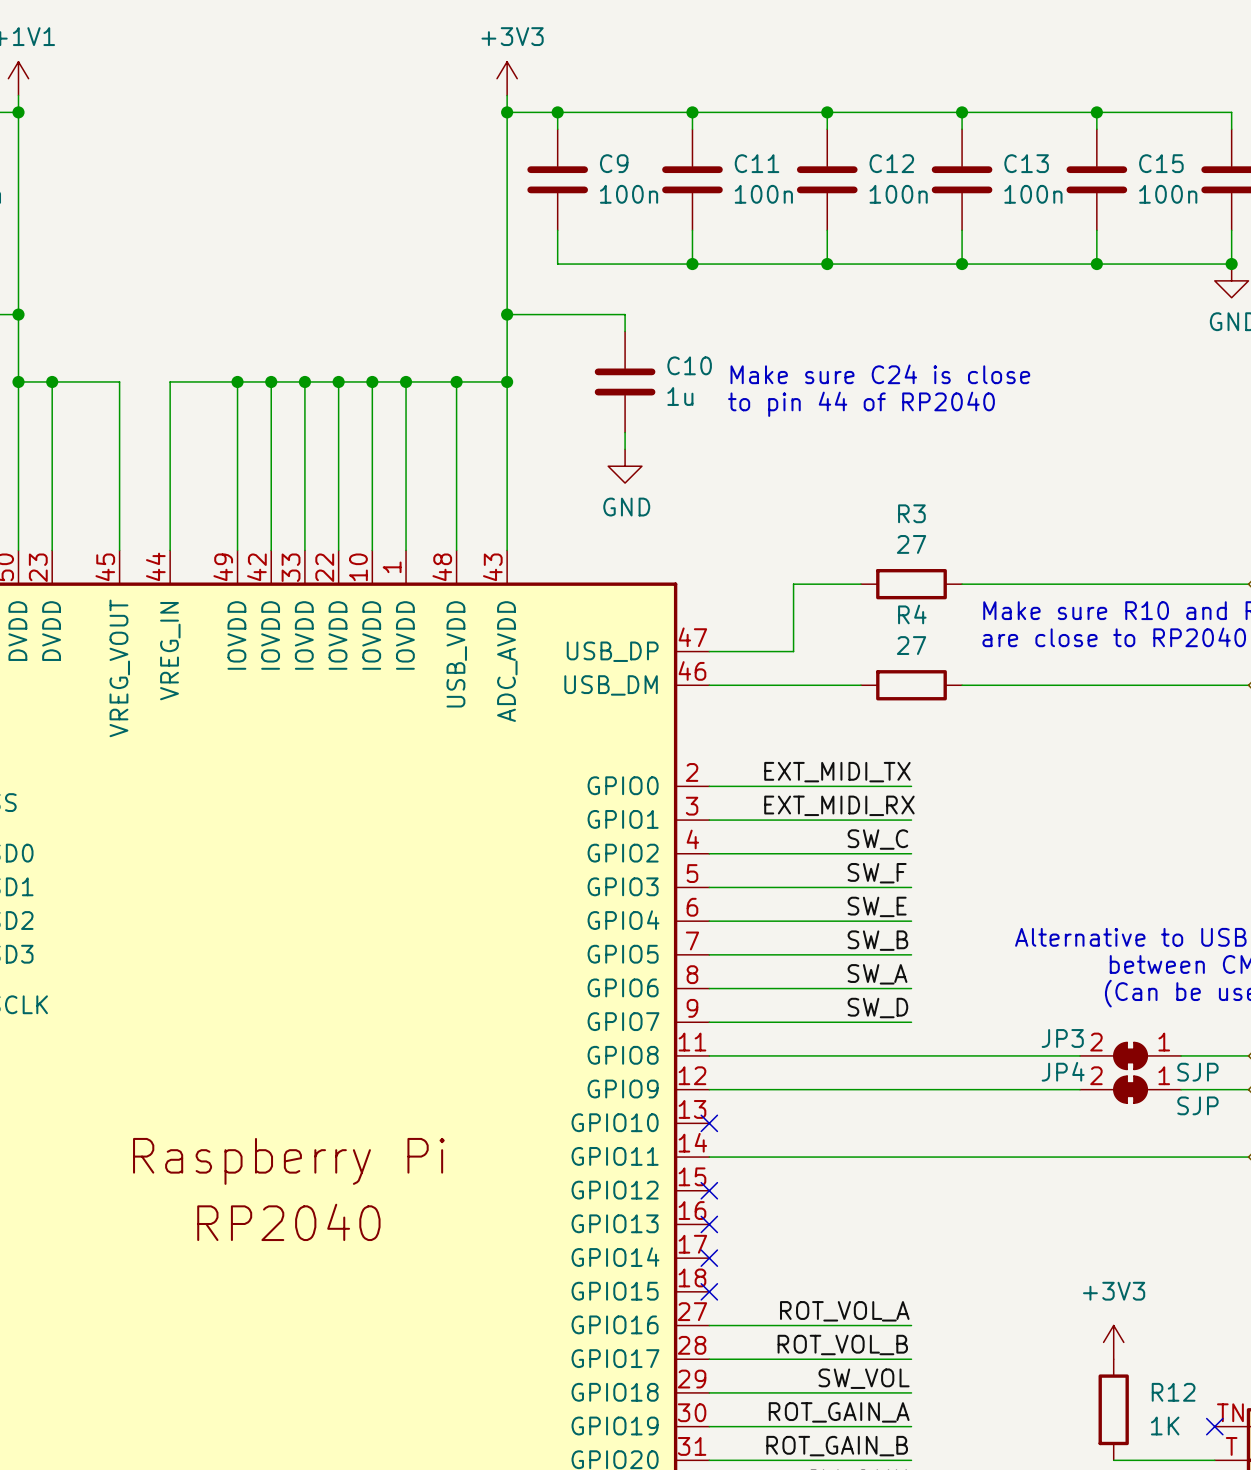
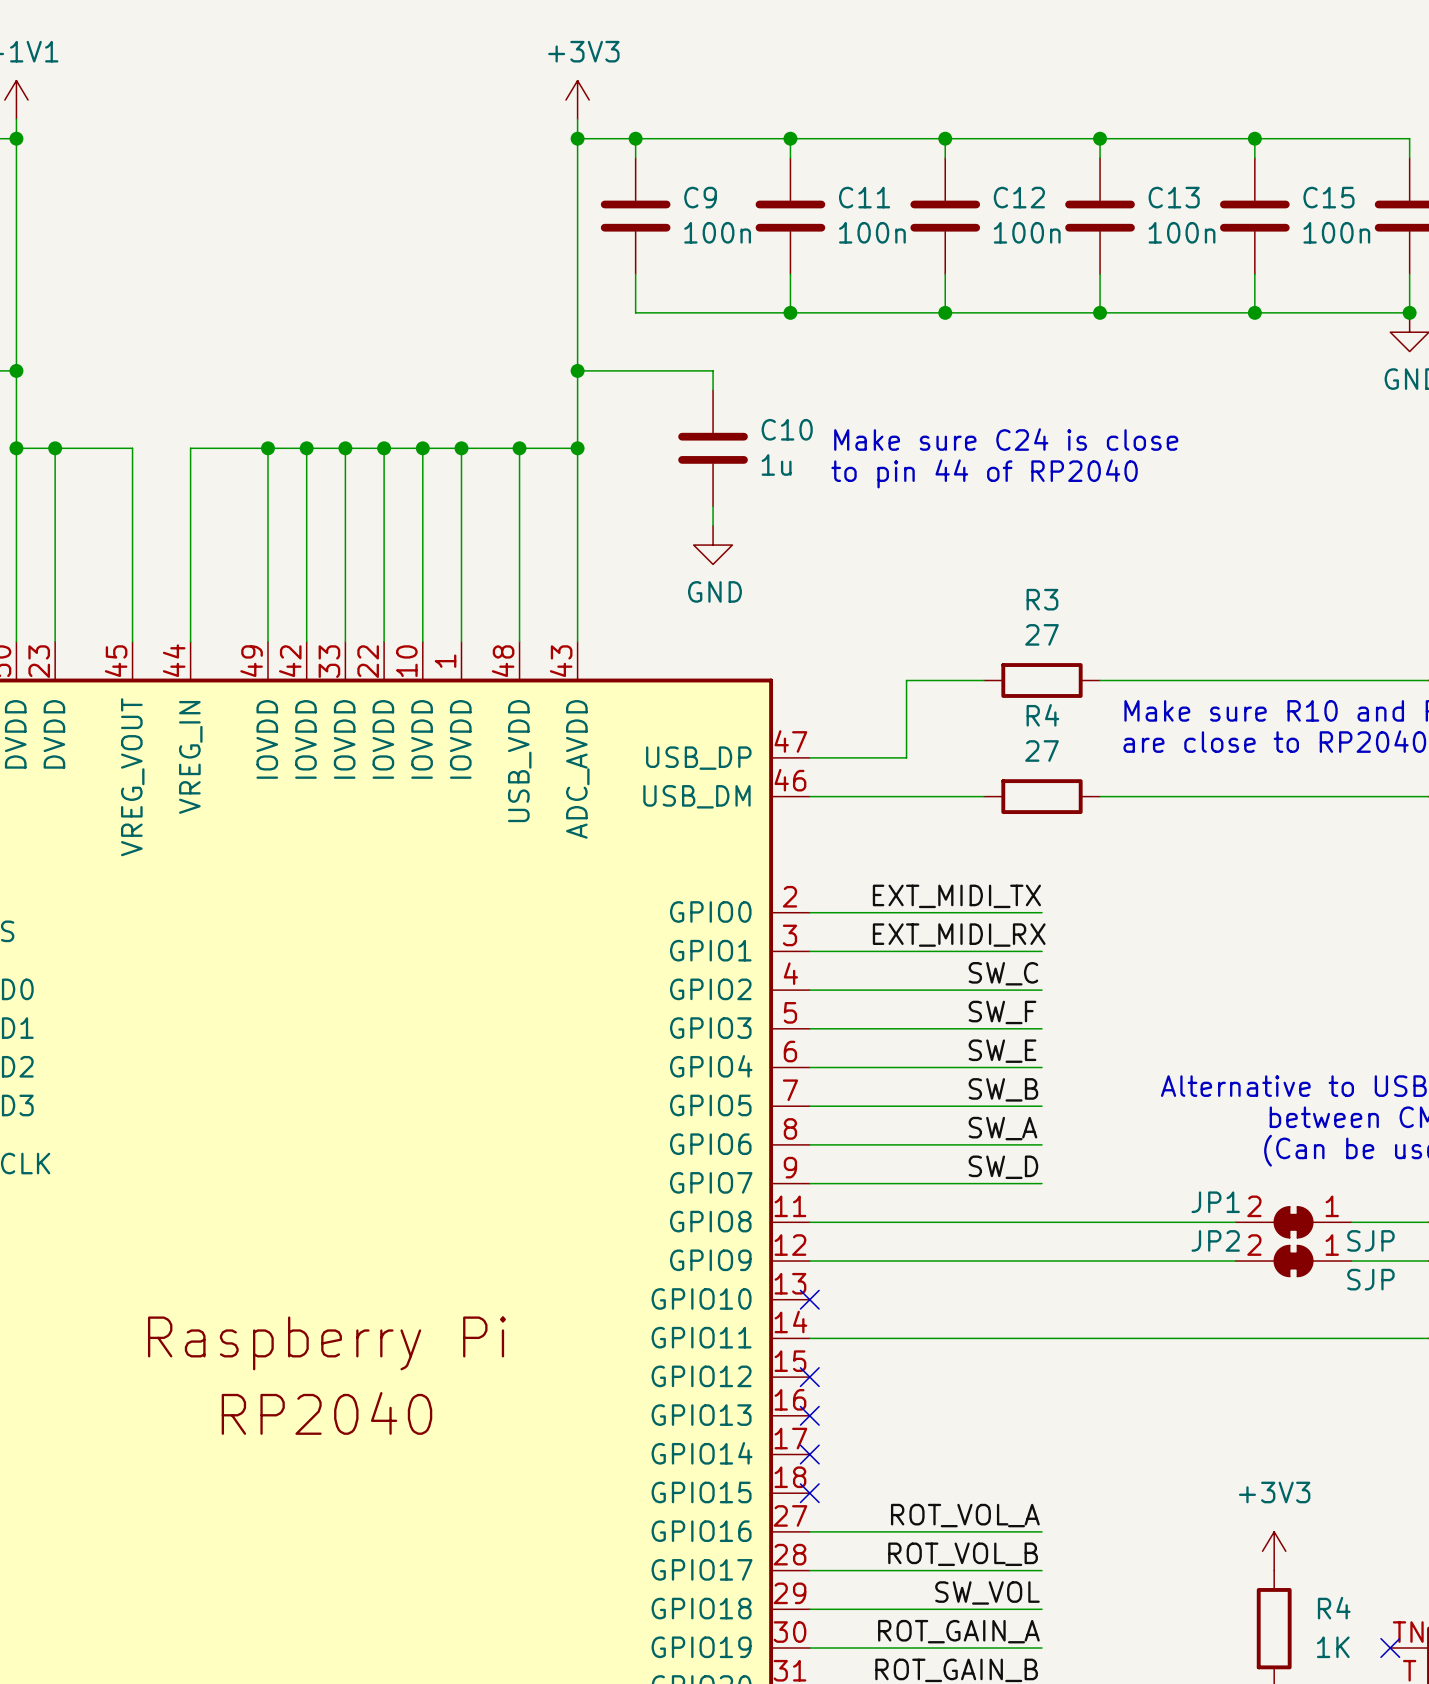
JP3 name: JP3 (1062, 1038) -> JP1 (1215, 1202)
JP4 name: JP4 (1063, 1071) -> JP2 (1215, 1240)
R12 name: R12 (1173, 1392) -> R4 (1334, 1608)

